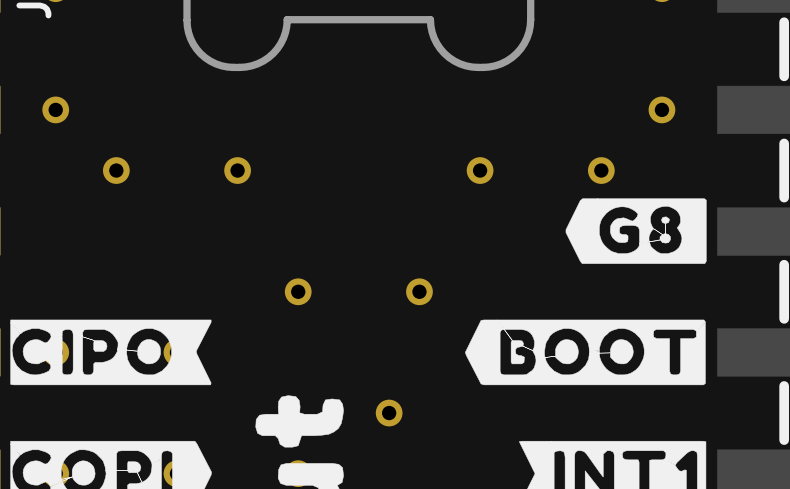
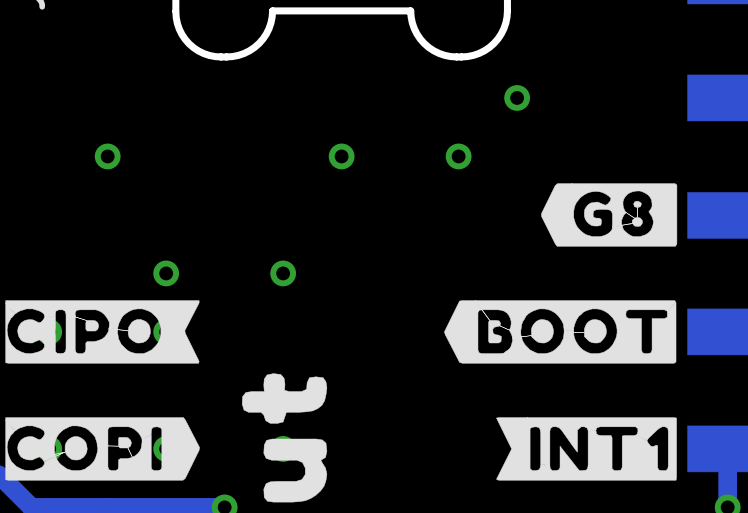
via: (55, 109) -> none
via: none -> (517, 97)
via: (661, 109) -> none
via: (237, 170) -> none
via: none -> (341, 156)
via: (601, 170) -> none
via: none -> (166, 273)
via: (419, 291) -> none
via: (389, 413) -> none

